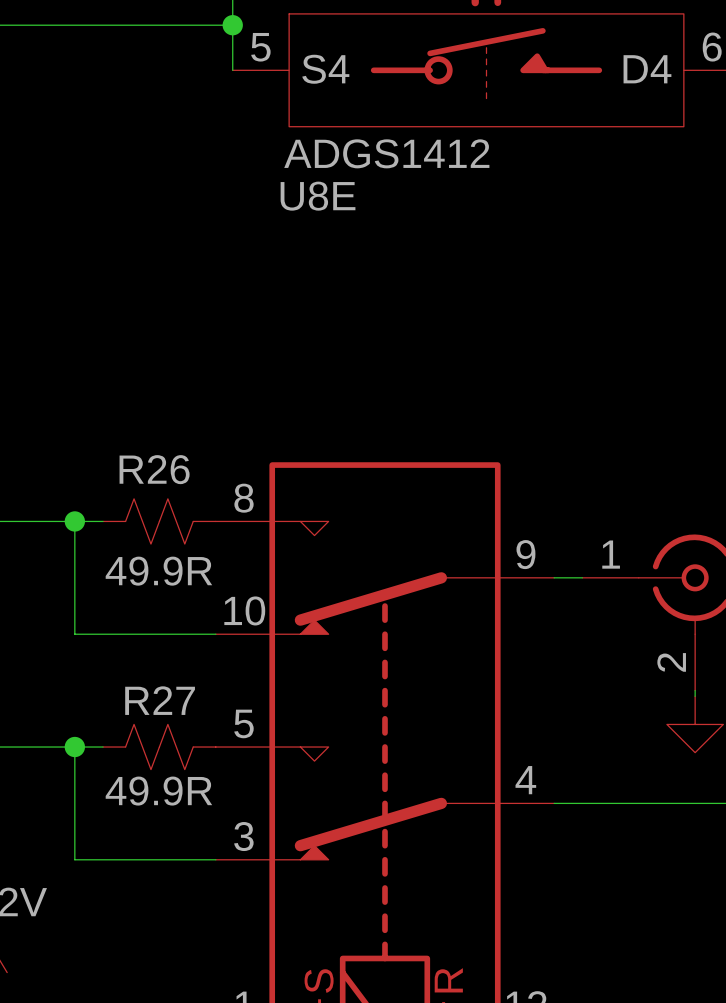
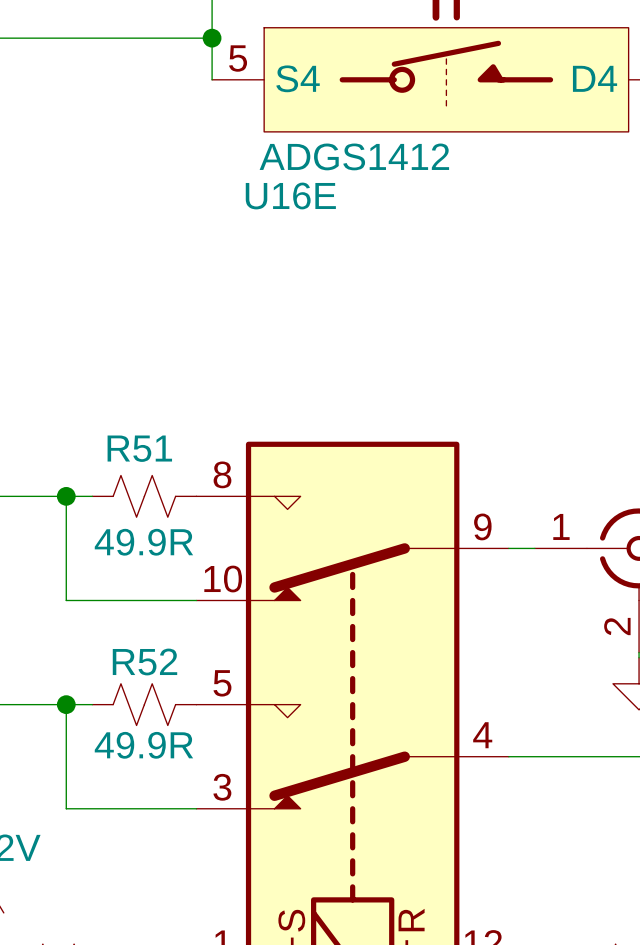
U8E name: U8E (318, 196) -> U16E (290, 195)
R26 name: R26 (154, 469) -> R51 (139, 448)
R27 name: R27 (160, 700) -> R52 (144, 661)

